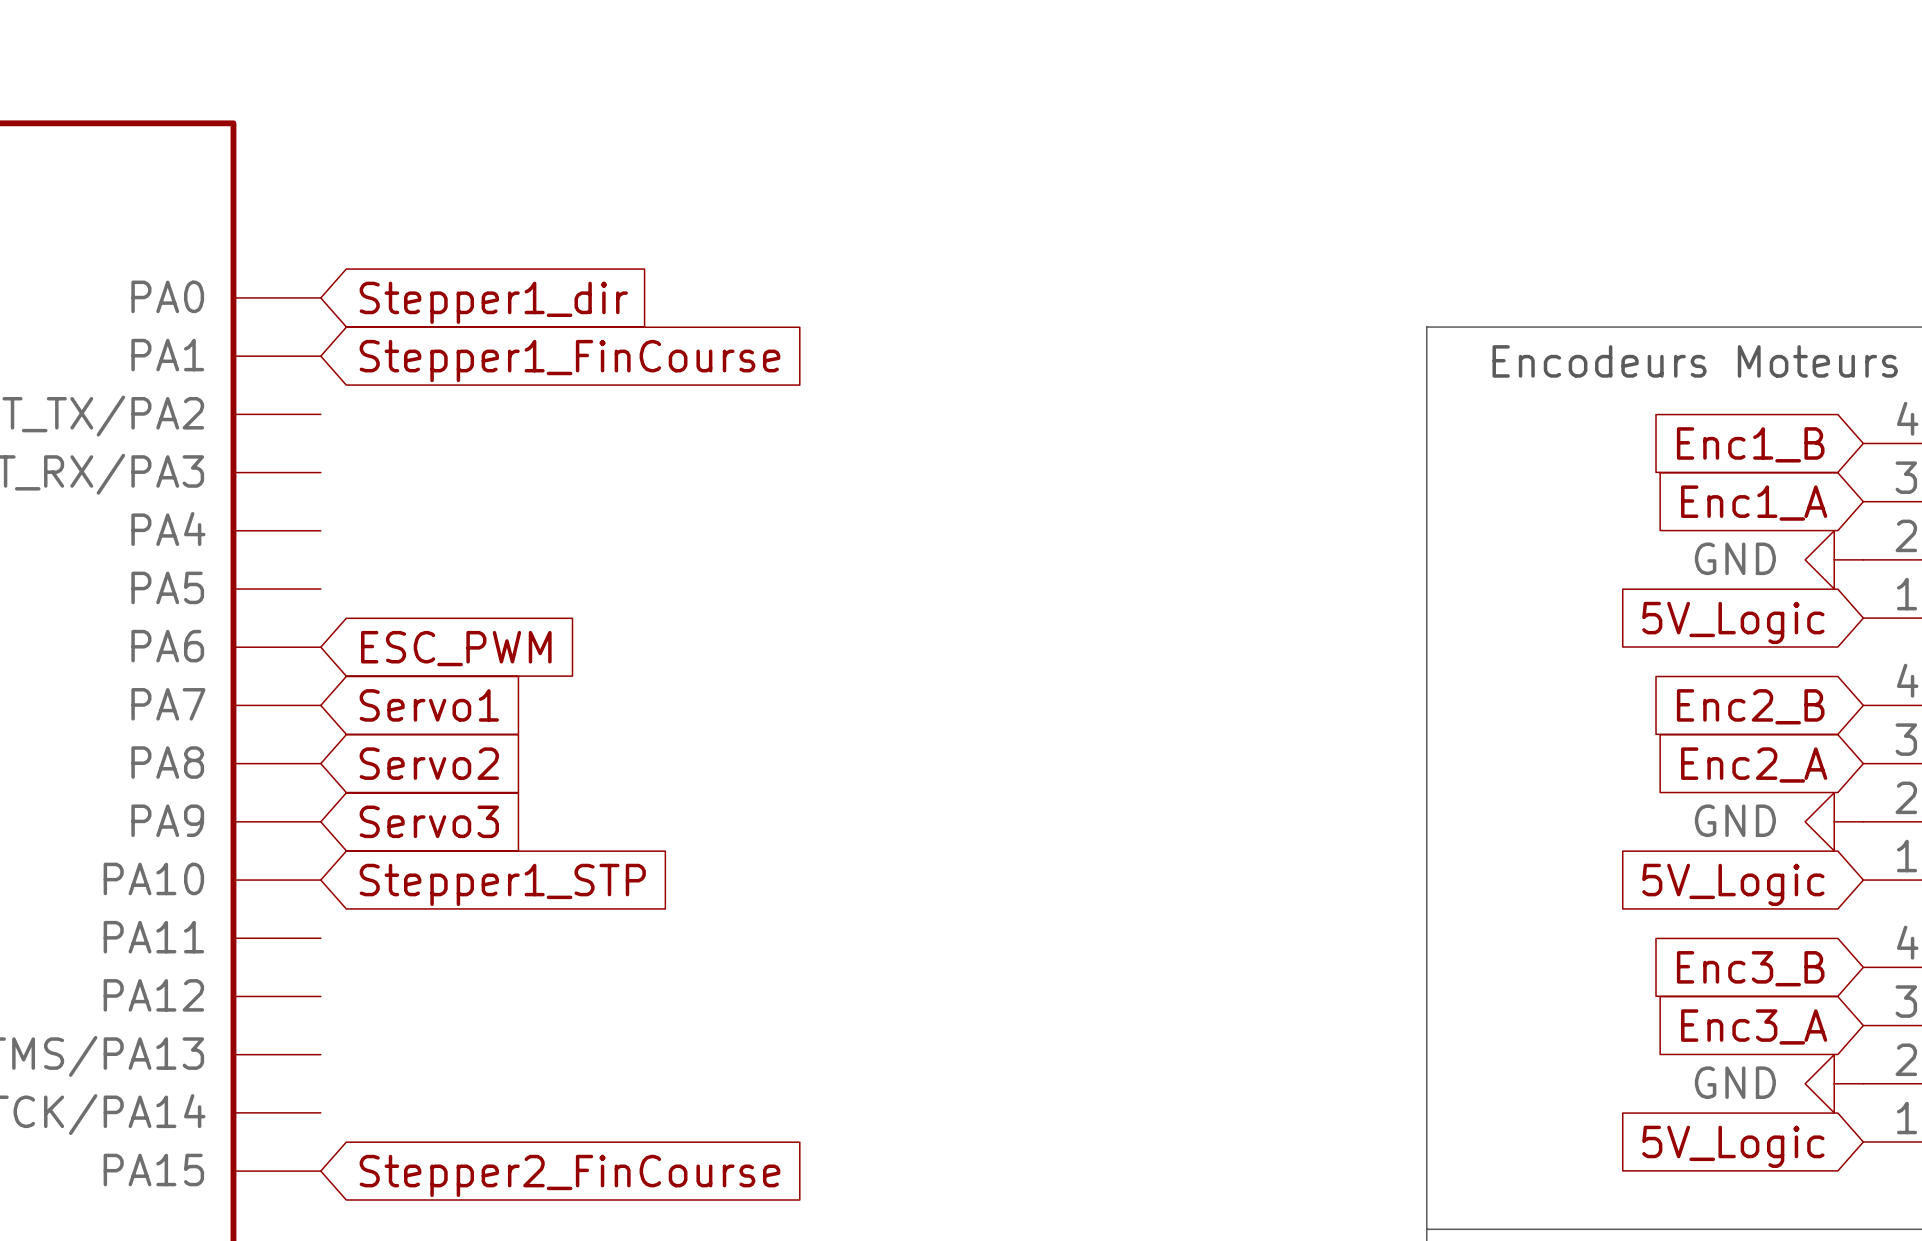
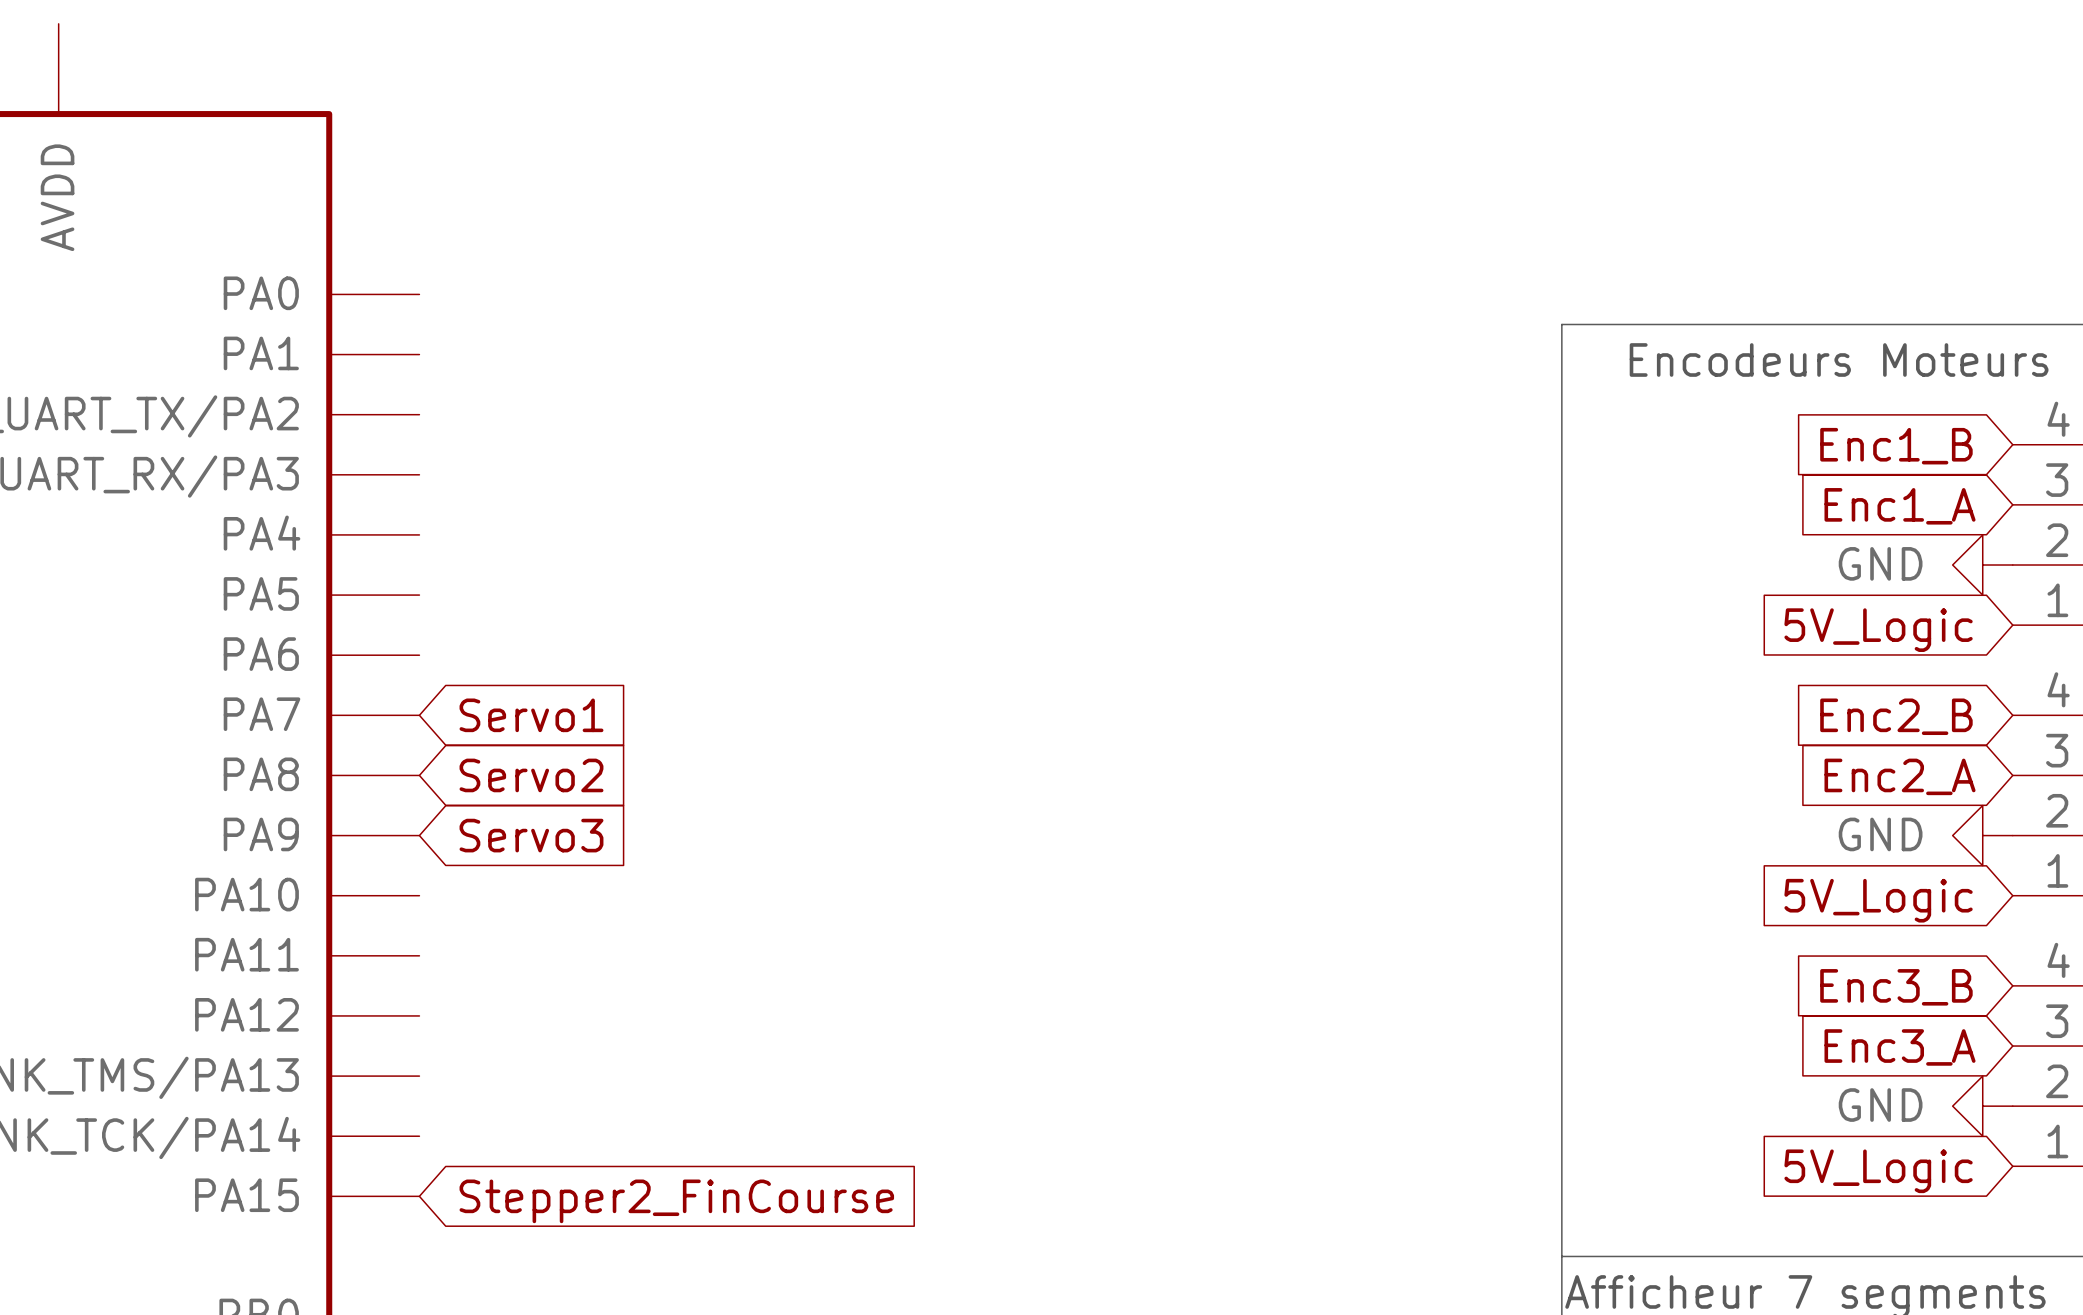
global label: Stepper1_dir (493, 302) -> none
global label: Stepper1_FinCourse (569, 361) -> none
global label: ESC_PWM (456, 648) -> none
global label: Stepper1_STP (502, 884) -> none

